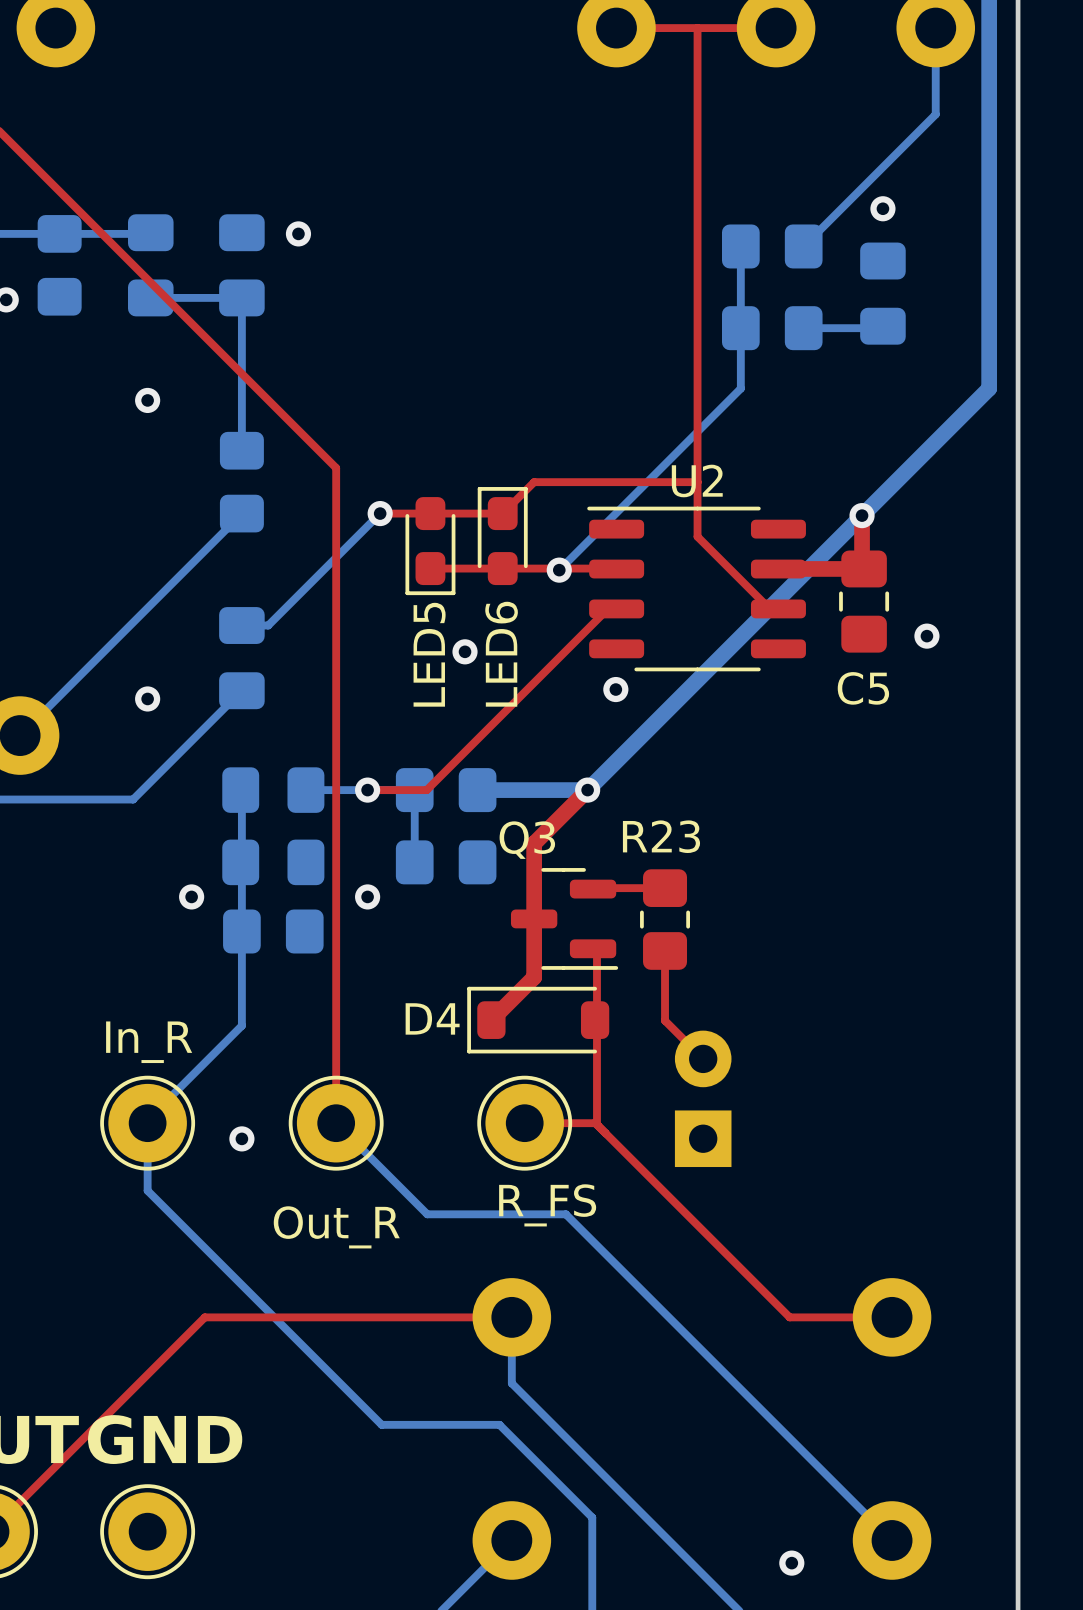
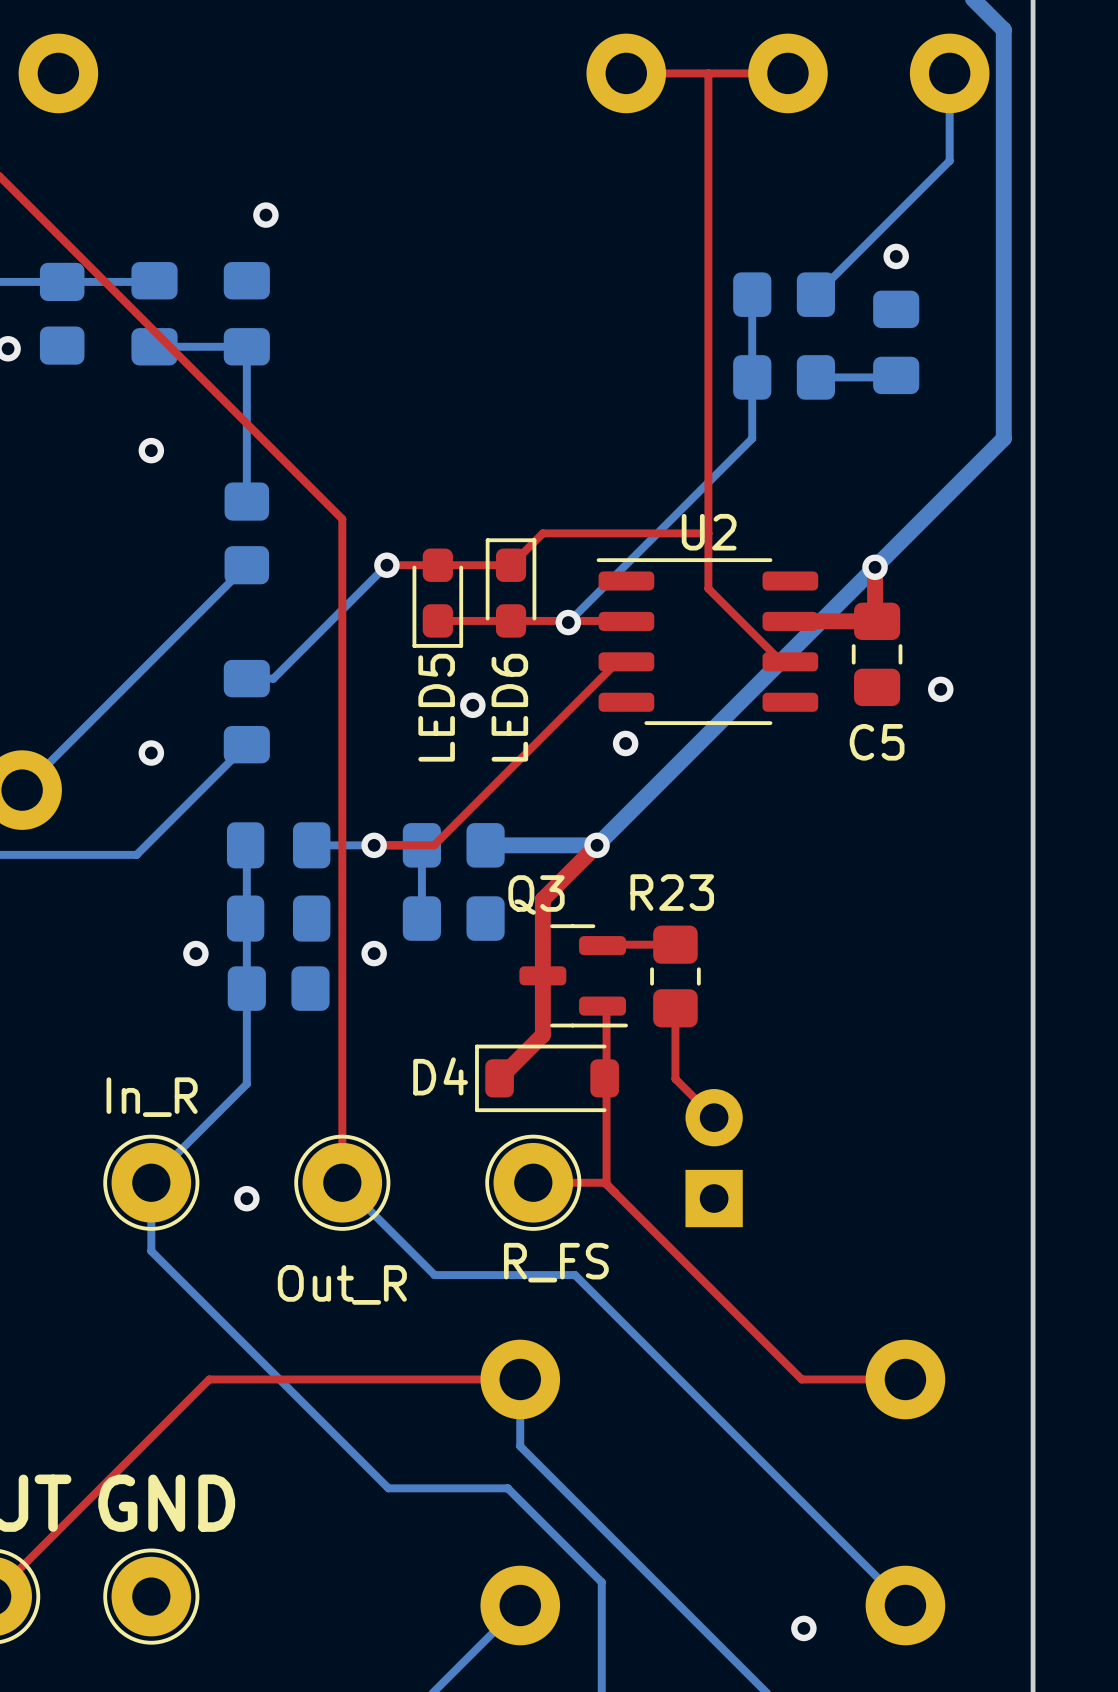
via position: (298, 233) -> (265, 215)

